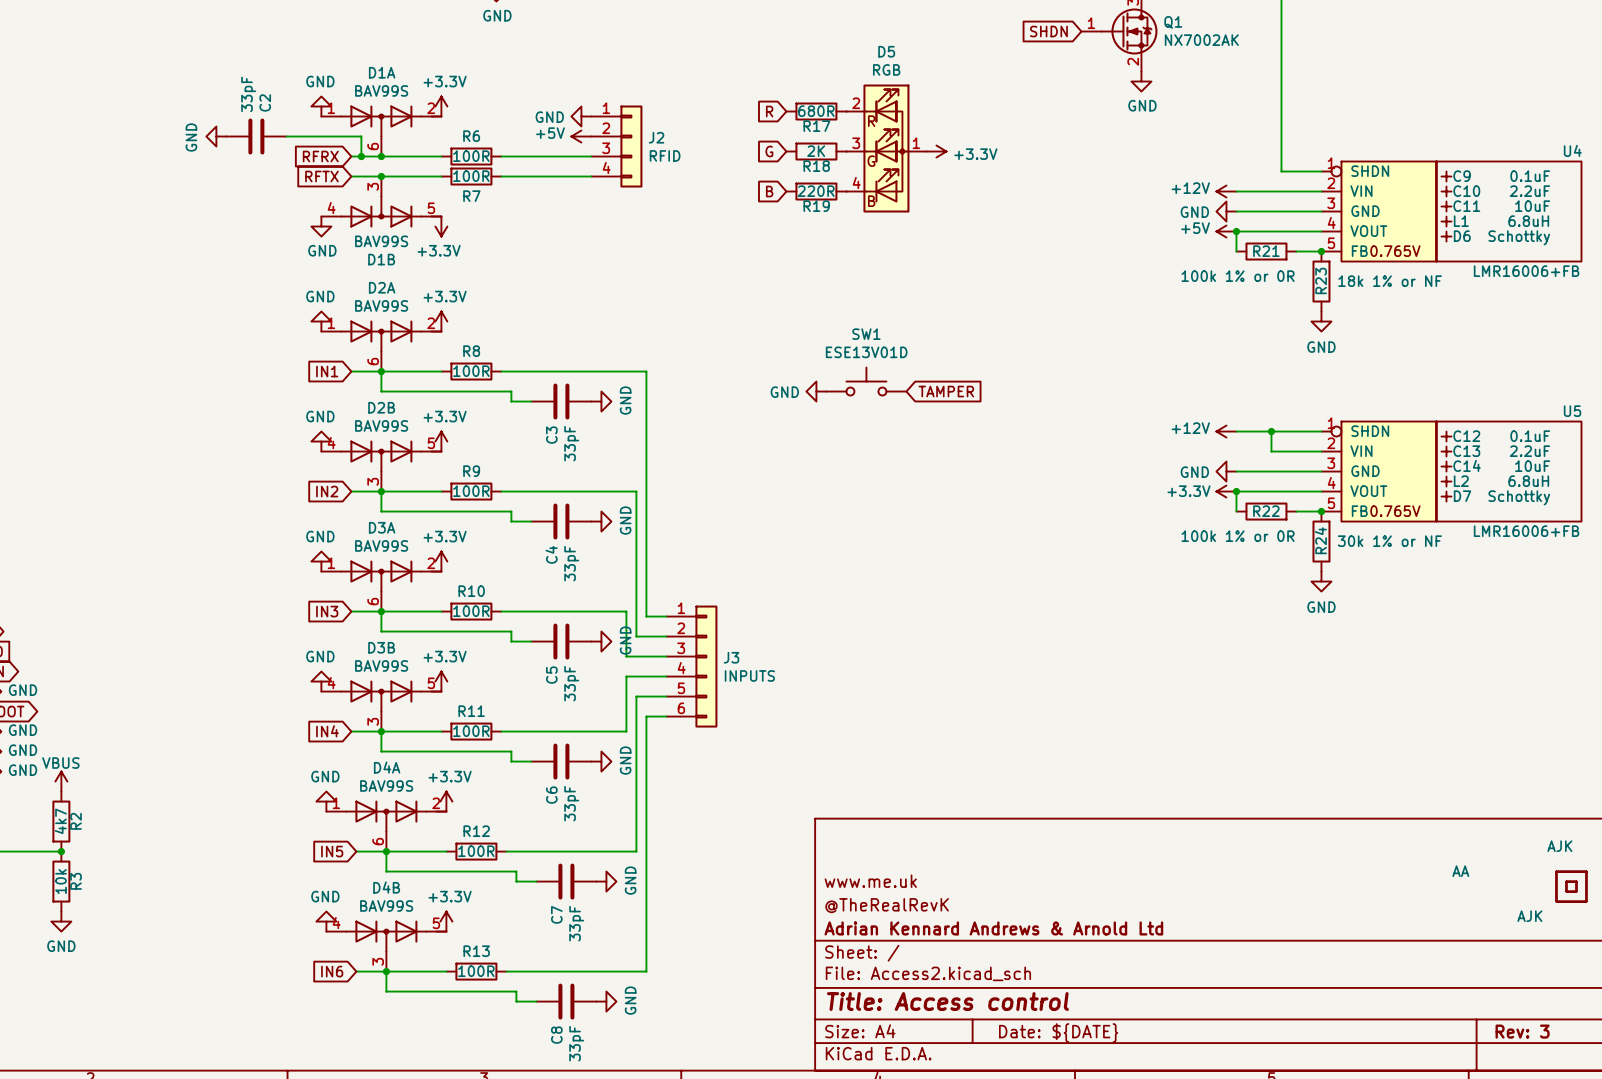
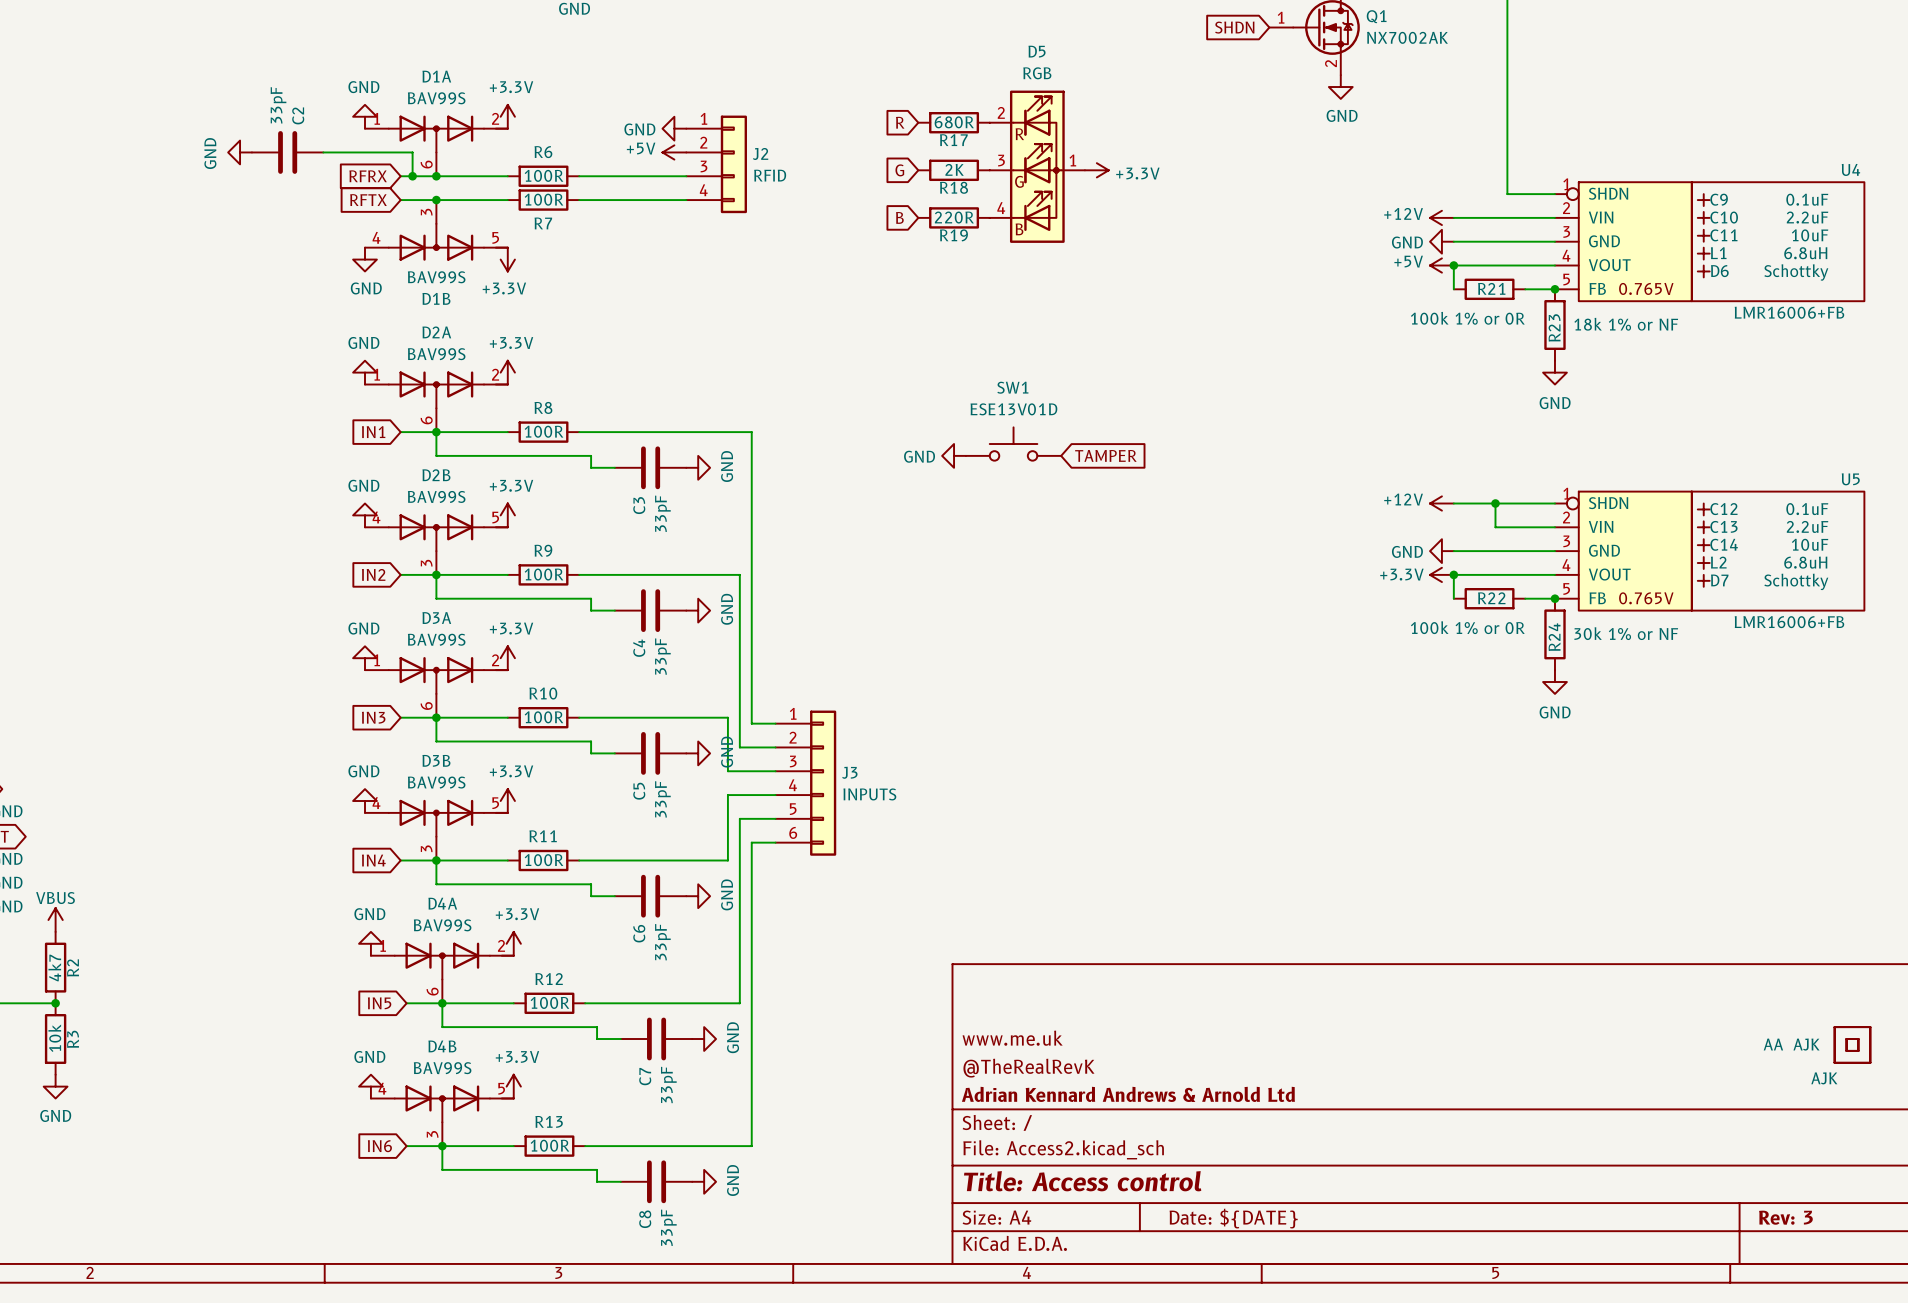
part: AJK (1559, 846) -> none
part position: (1460, 871) -> (1773, 1044)
part: none -> AJK (1806, 1044)
part: none -> AJK (1824, 1078)
part: AJK (1529, 916) -> none

